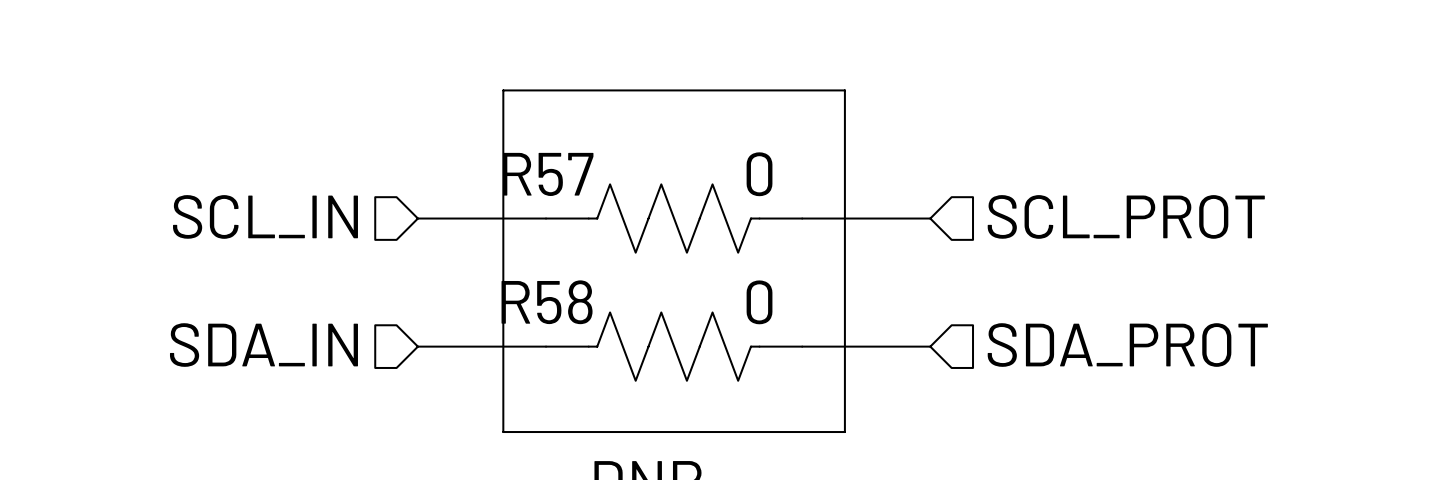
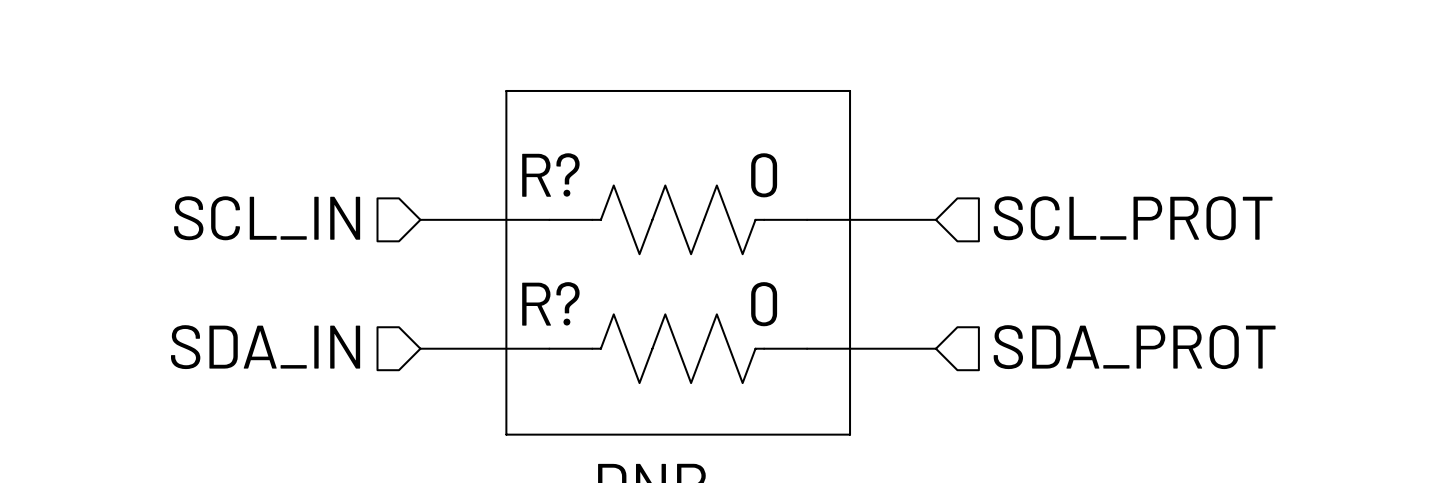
R57 name: R57 (548, 174) -> R? (550, 175)
R58 name: R58 (547, 302) -> R? (550, 303)

